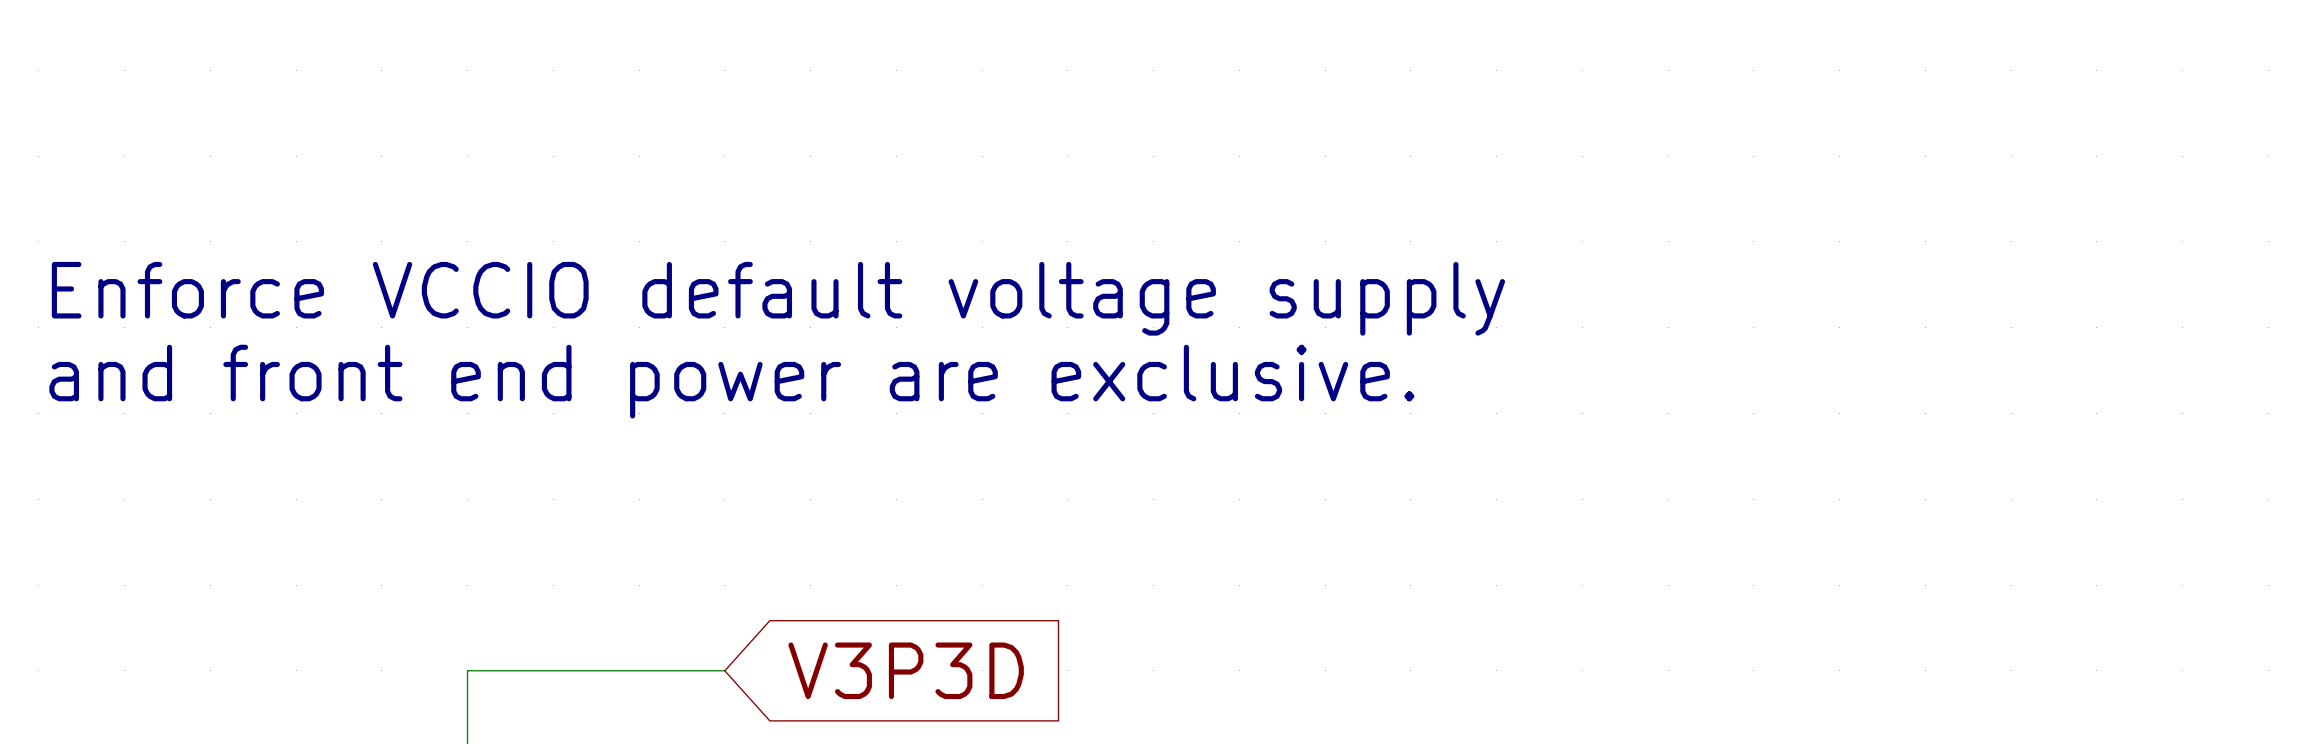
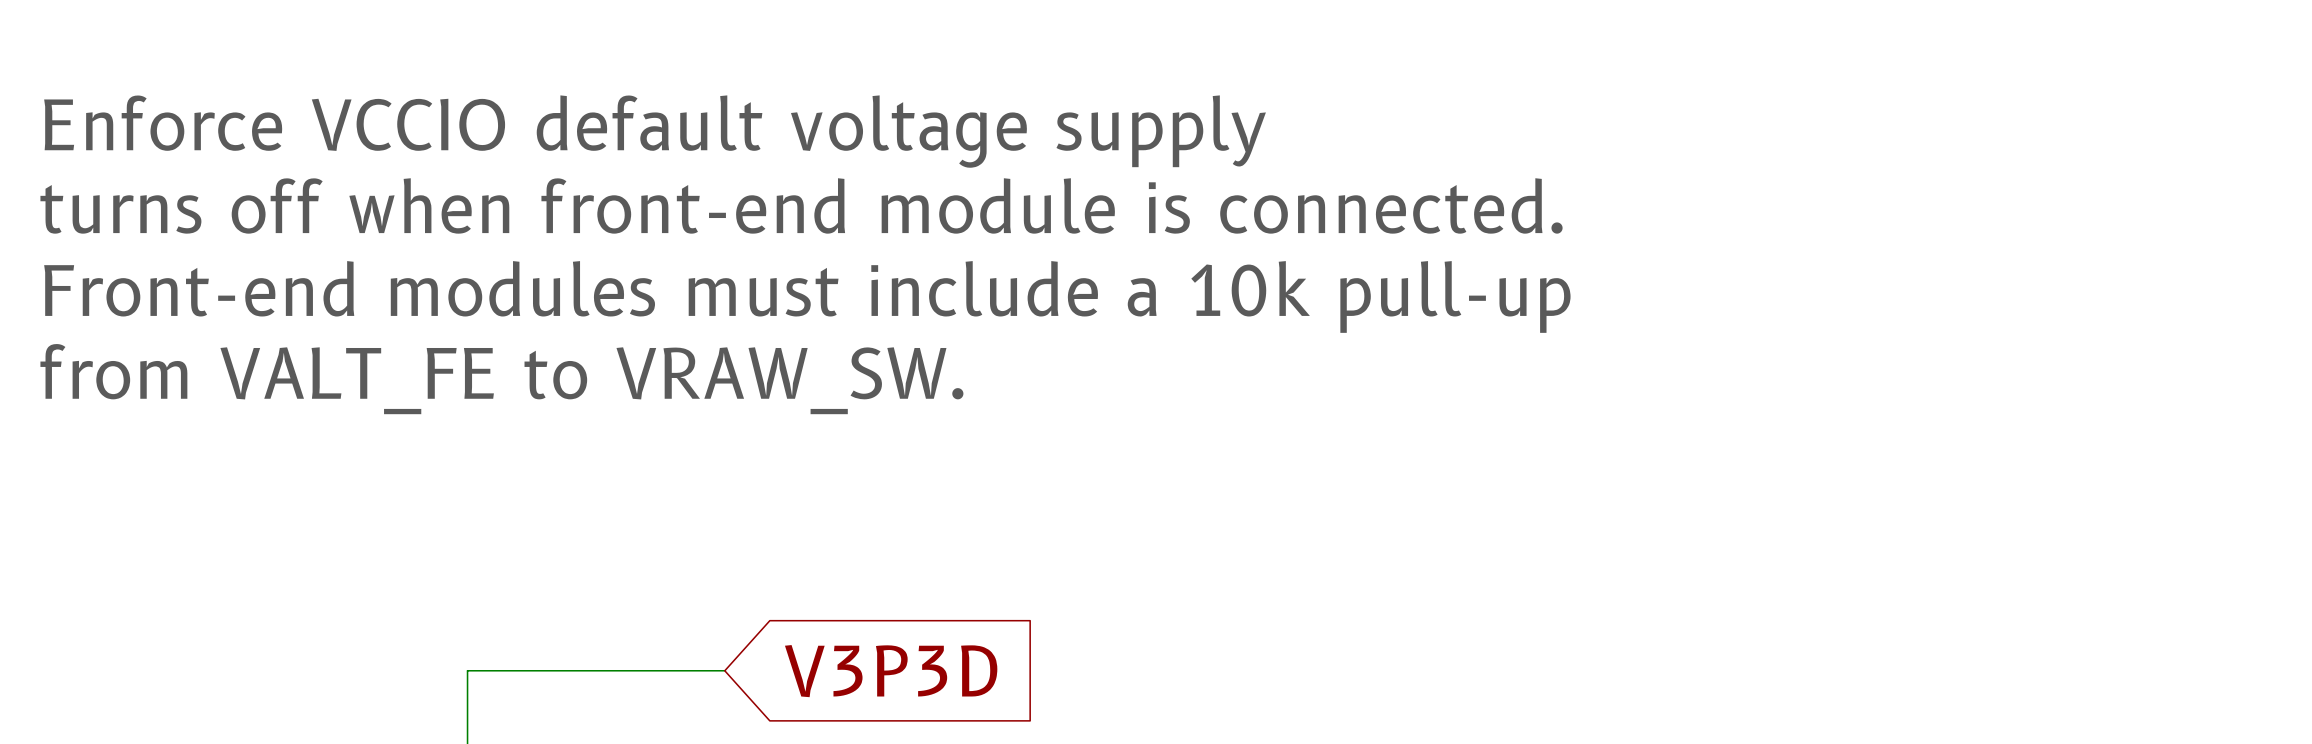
text: none -> Enforce VCCIO default voltage supply (655, 131)
text: none -> turns off when front-end module is connected. (801, 205)
text: Enforce VCCIO default voltage supply (778, 298) -> Front-end modules must include a 10k pull-up (807, 296)
text: and front end power are exclusive. (731, 381) -> from VALT_FE to VRAW_SW. (501, 379)

